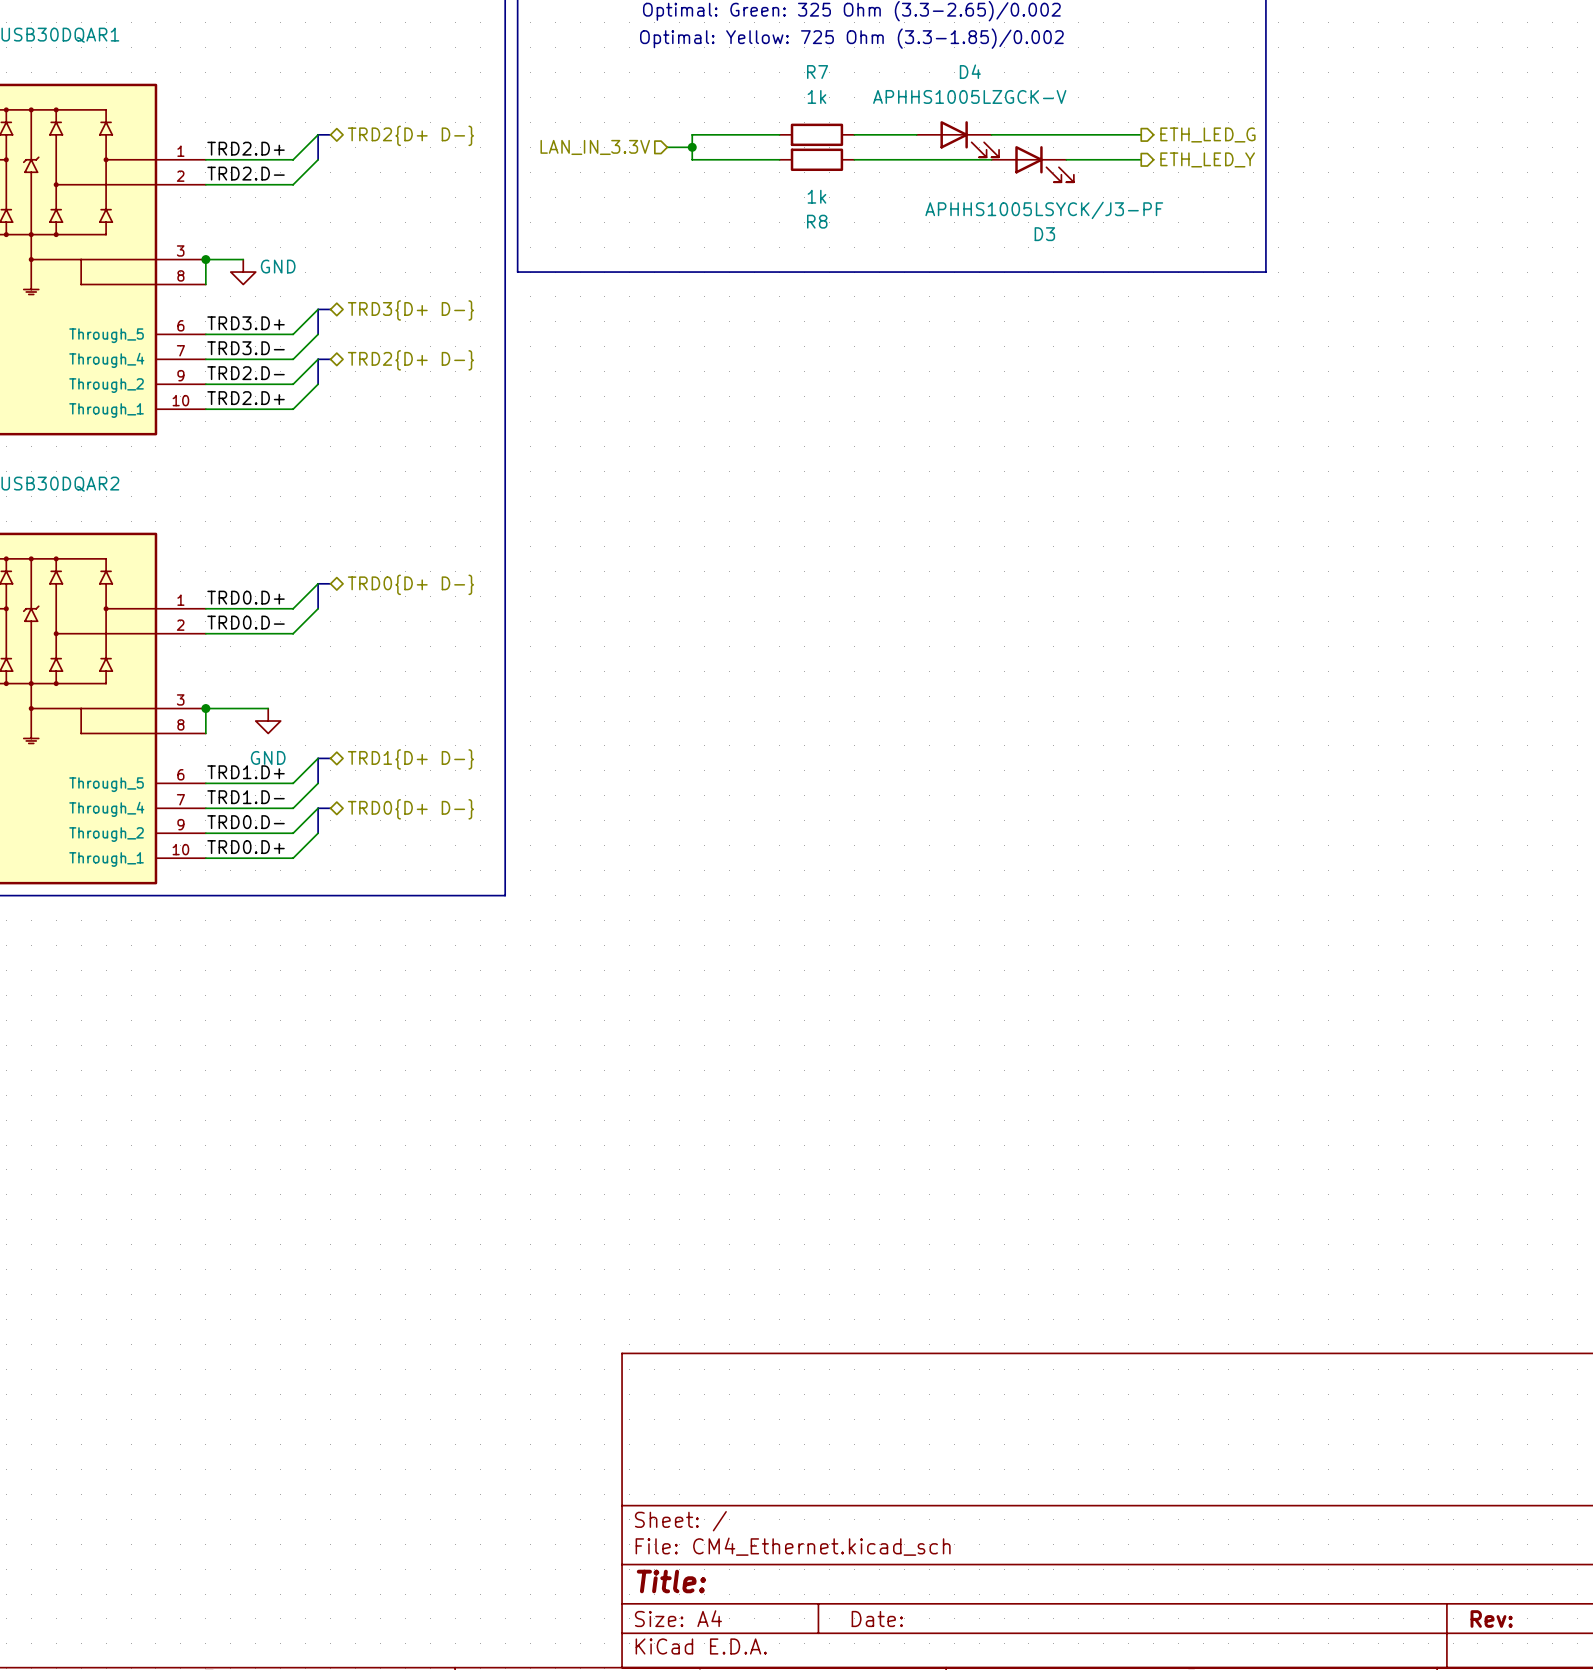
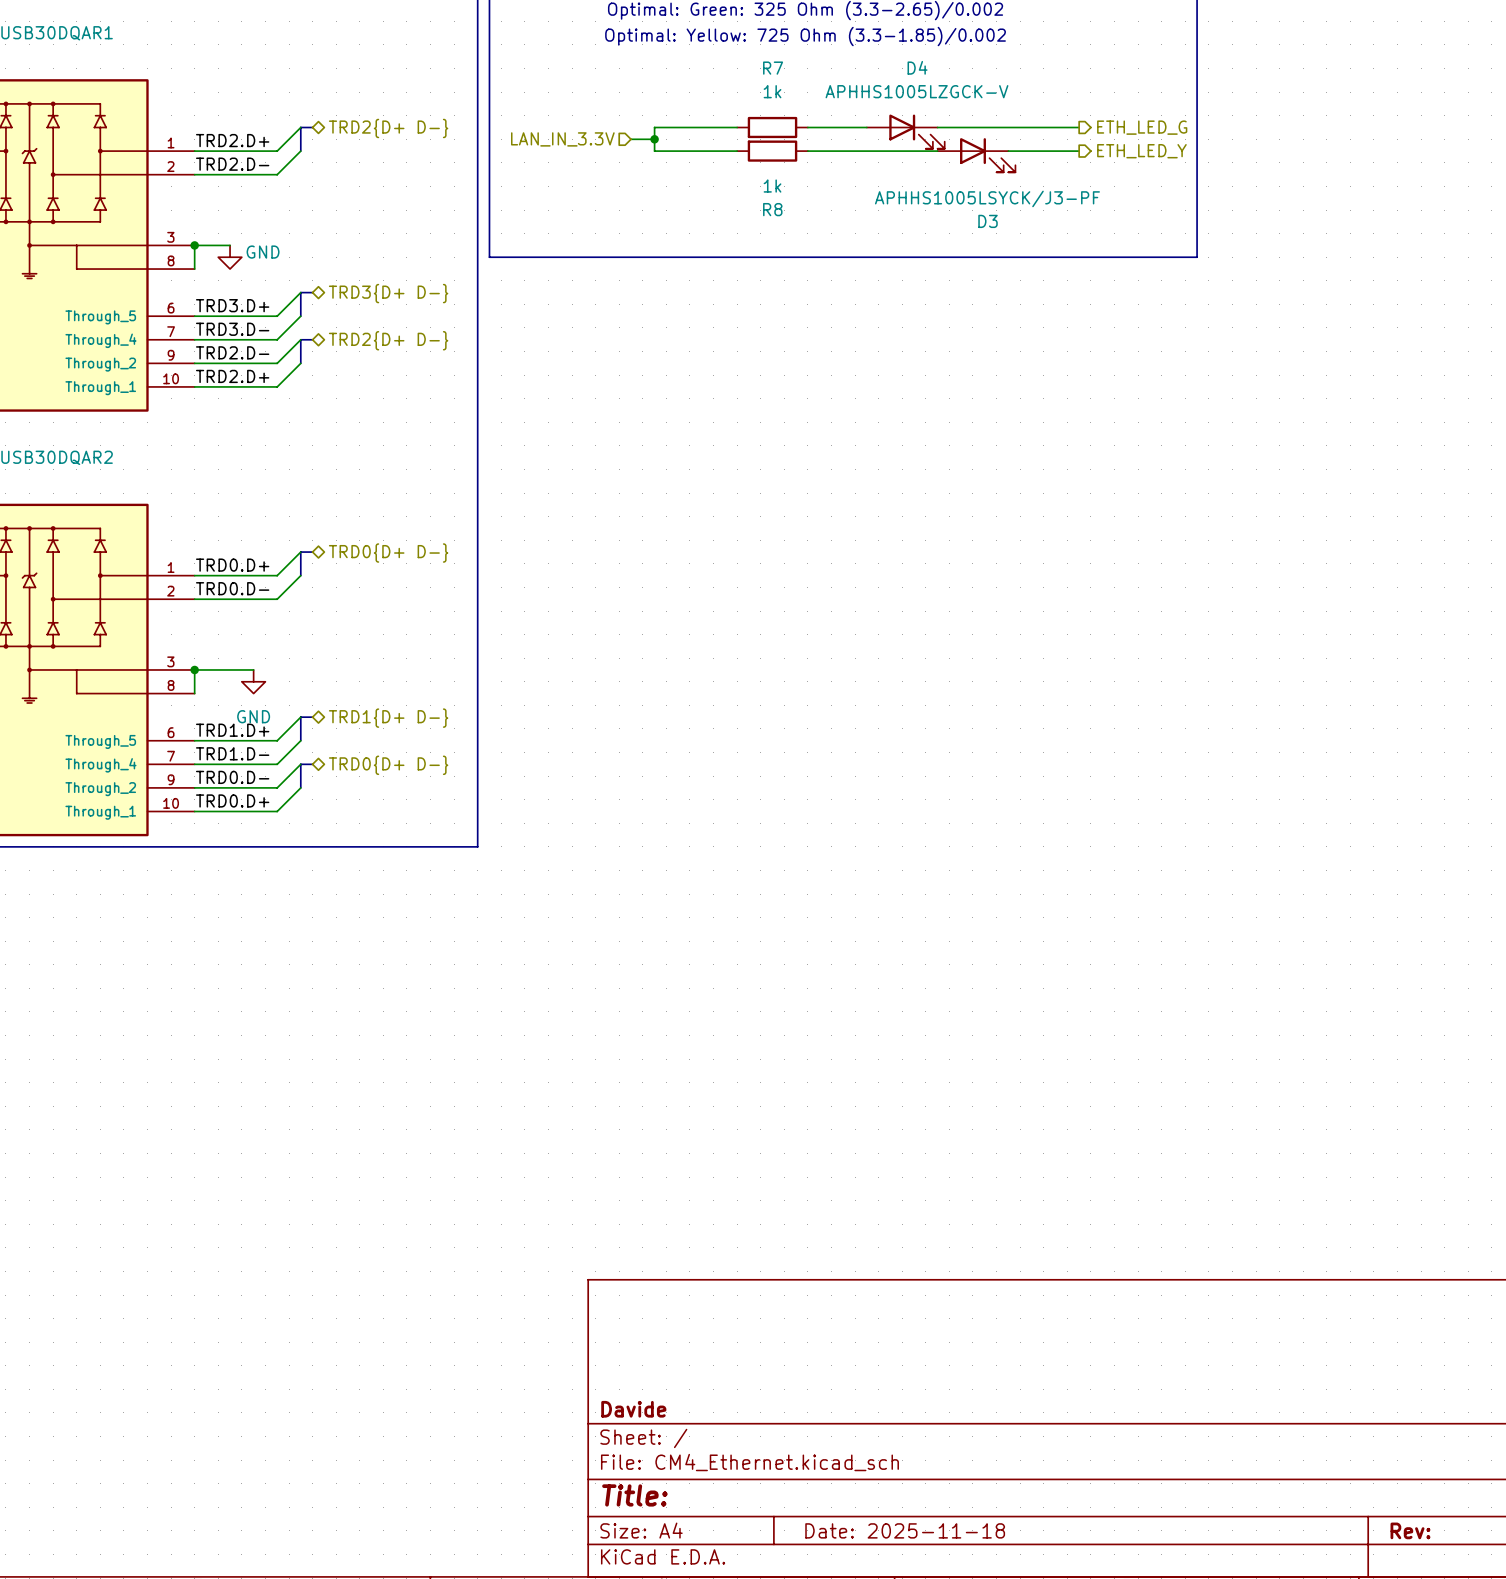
title block: none -> Davide (633, 1409)
title block: Date: (877, 1618) -> Date: 2025-11-18 (905, 1530)

